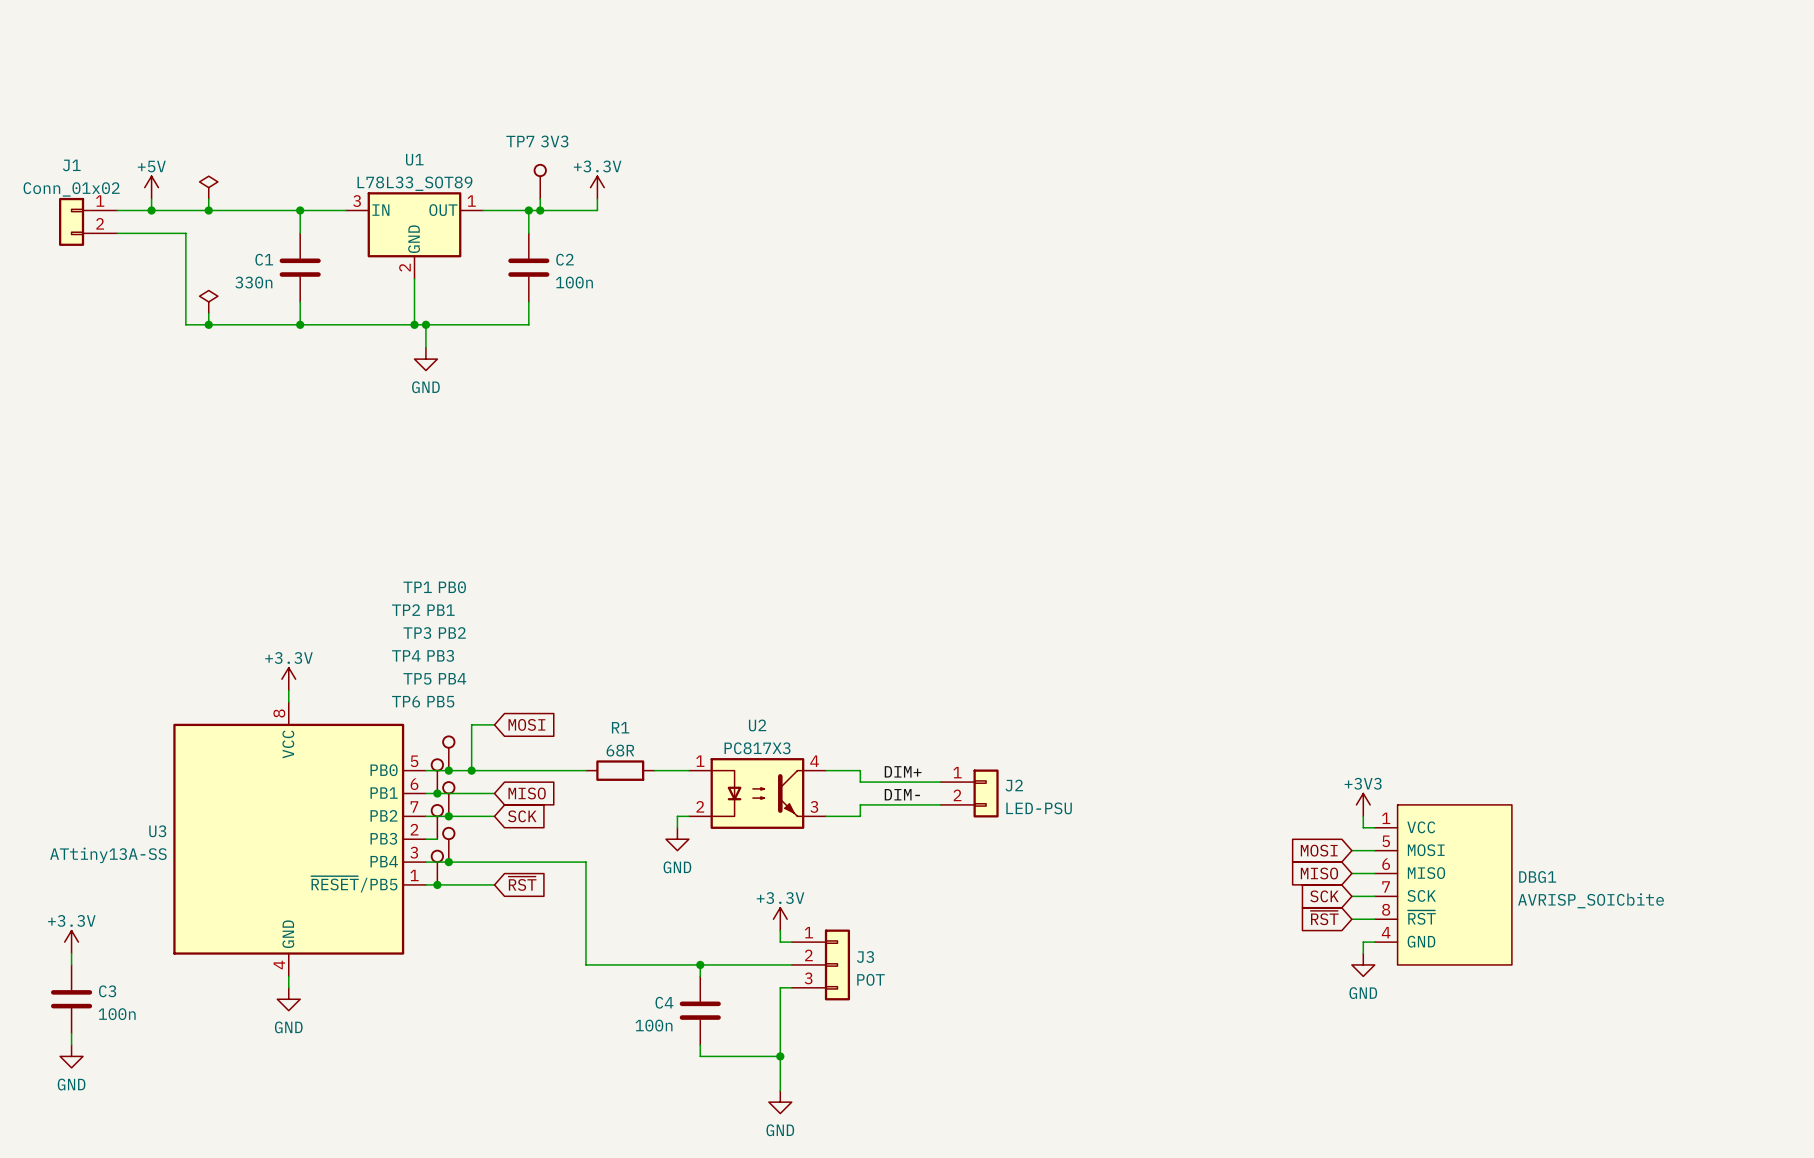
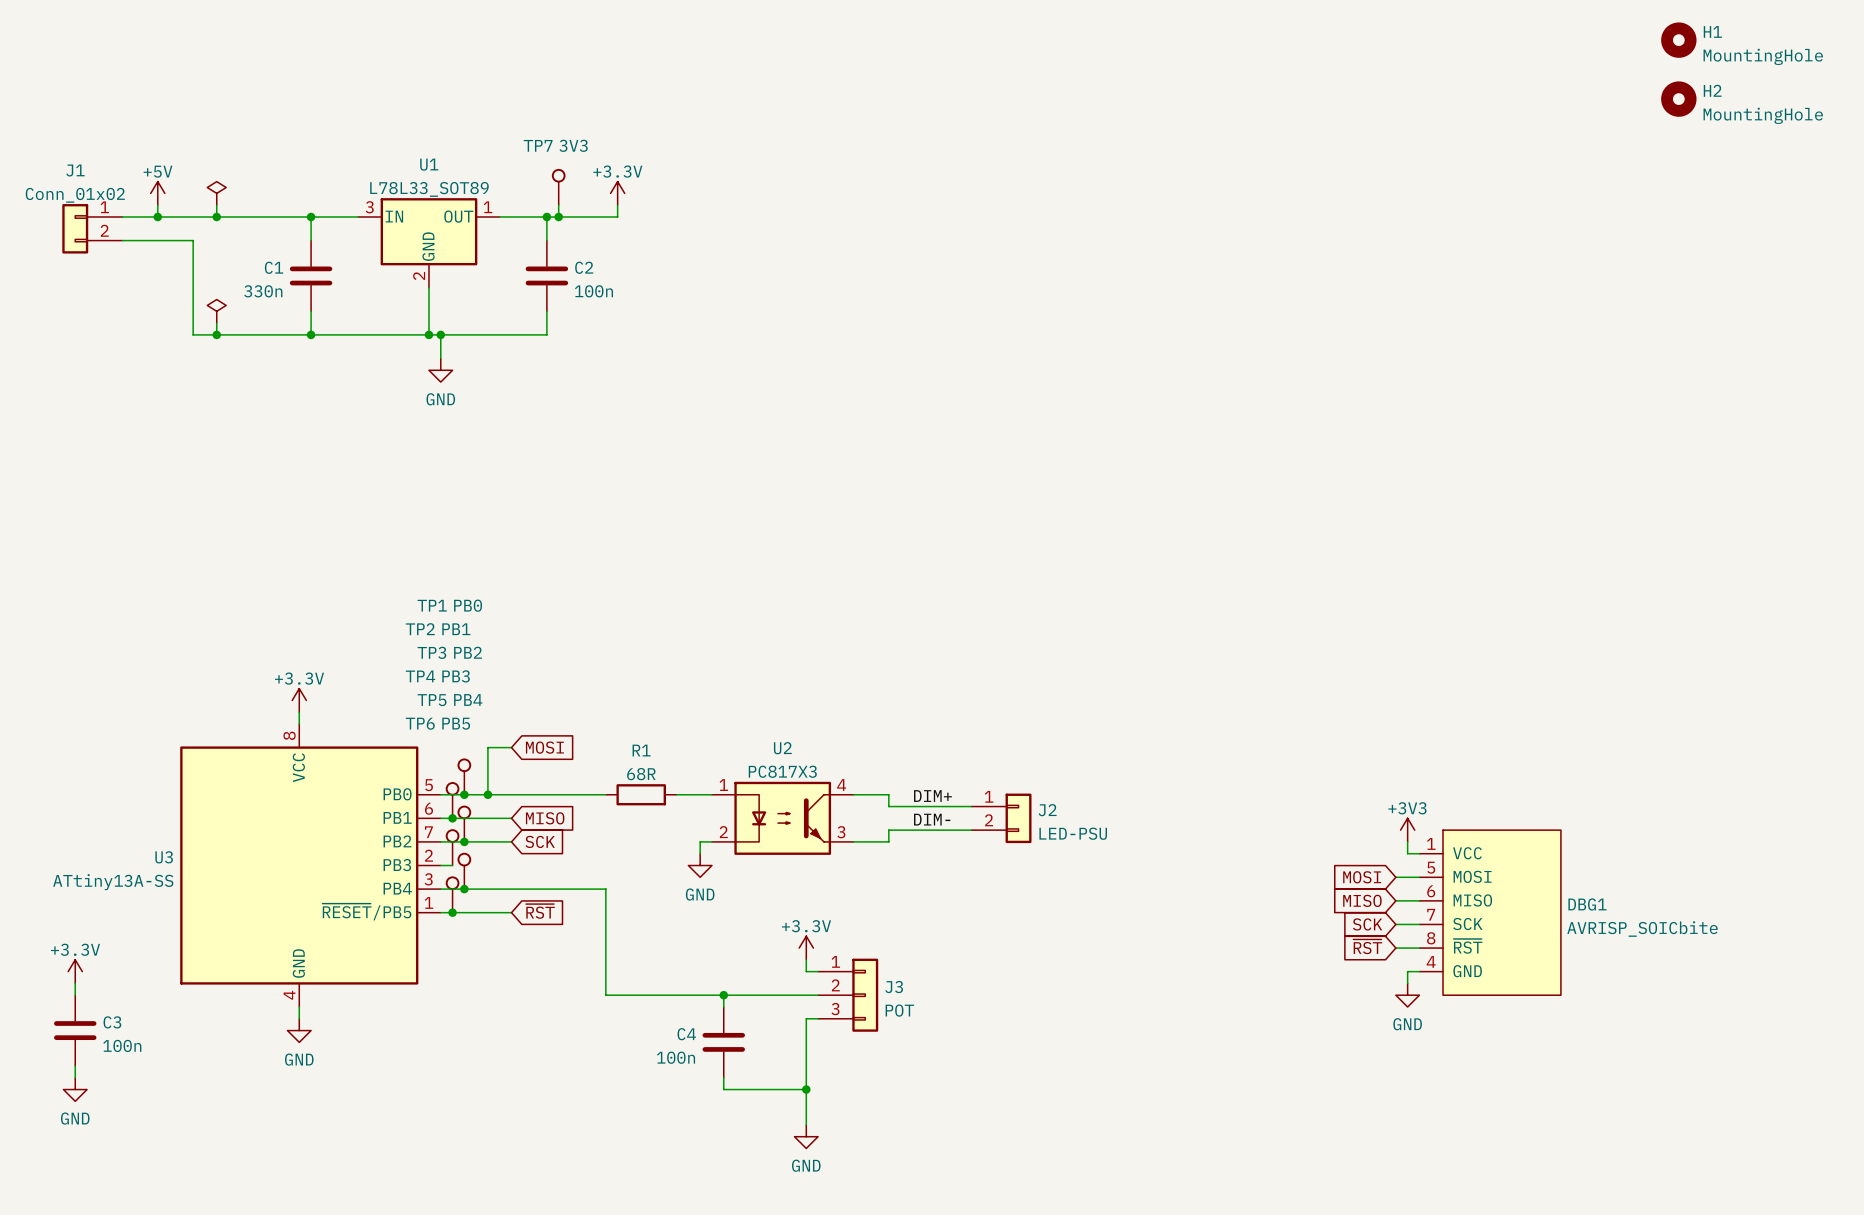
H1: none -> MountingHole (1678, 40)
H2: none -> MountingHole (1678, 99)

